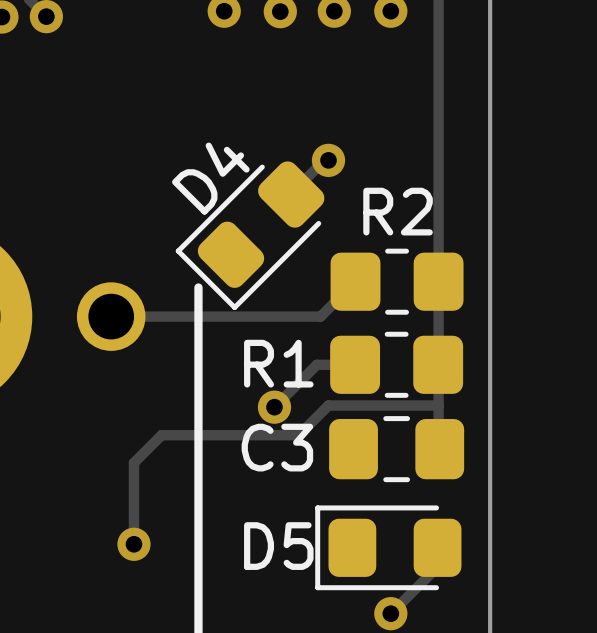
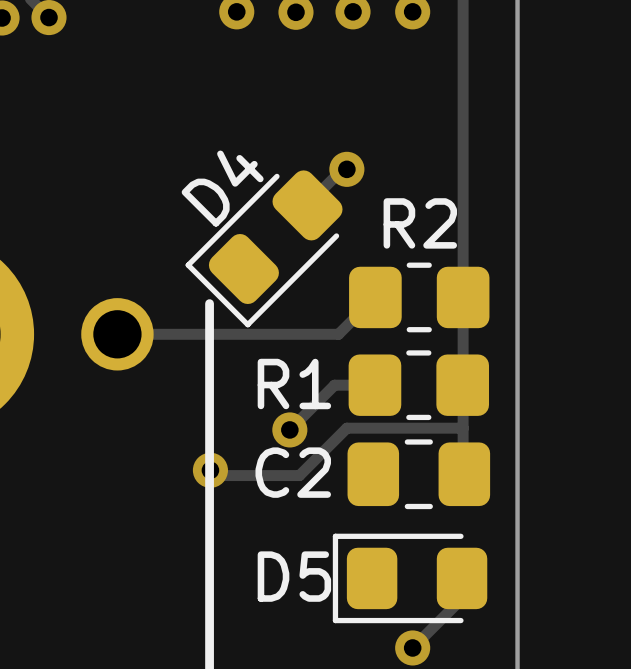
track: (298, 435) (161, 435) (133, 462) (133, 544) -> (315, 459) (299, 475) (215, 475) (210, 470)
C3 name: C3 (277, 447) -> C2 (293, 472)
via position: (133, 544) -> (210, 470)

